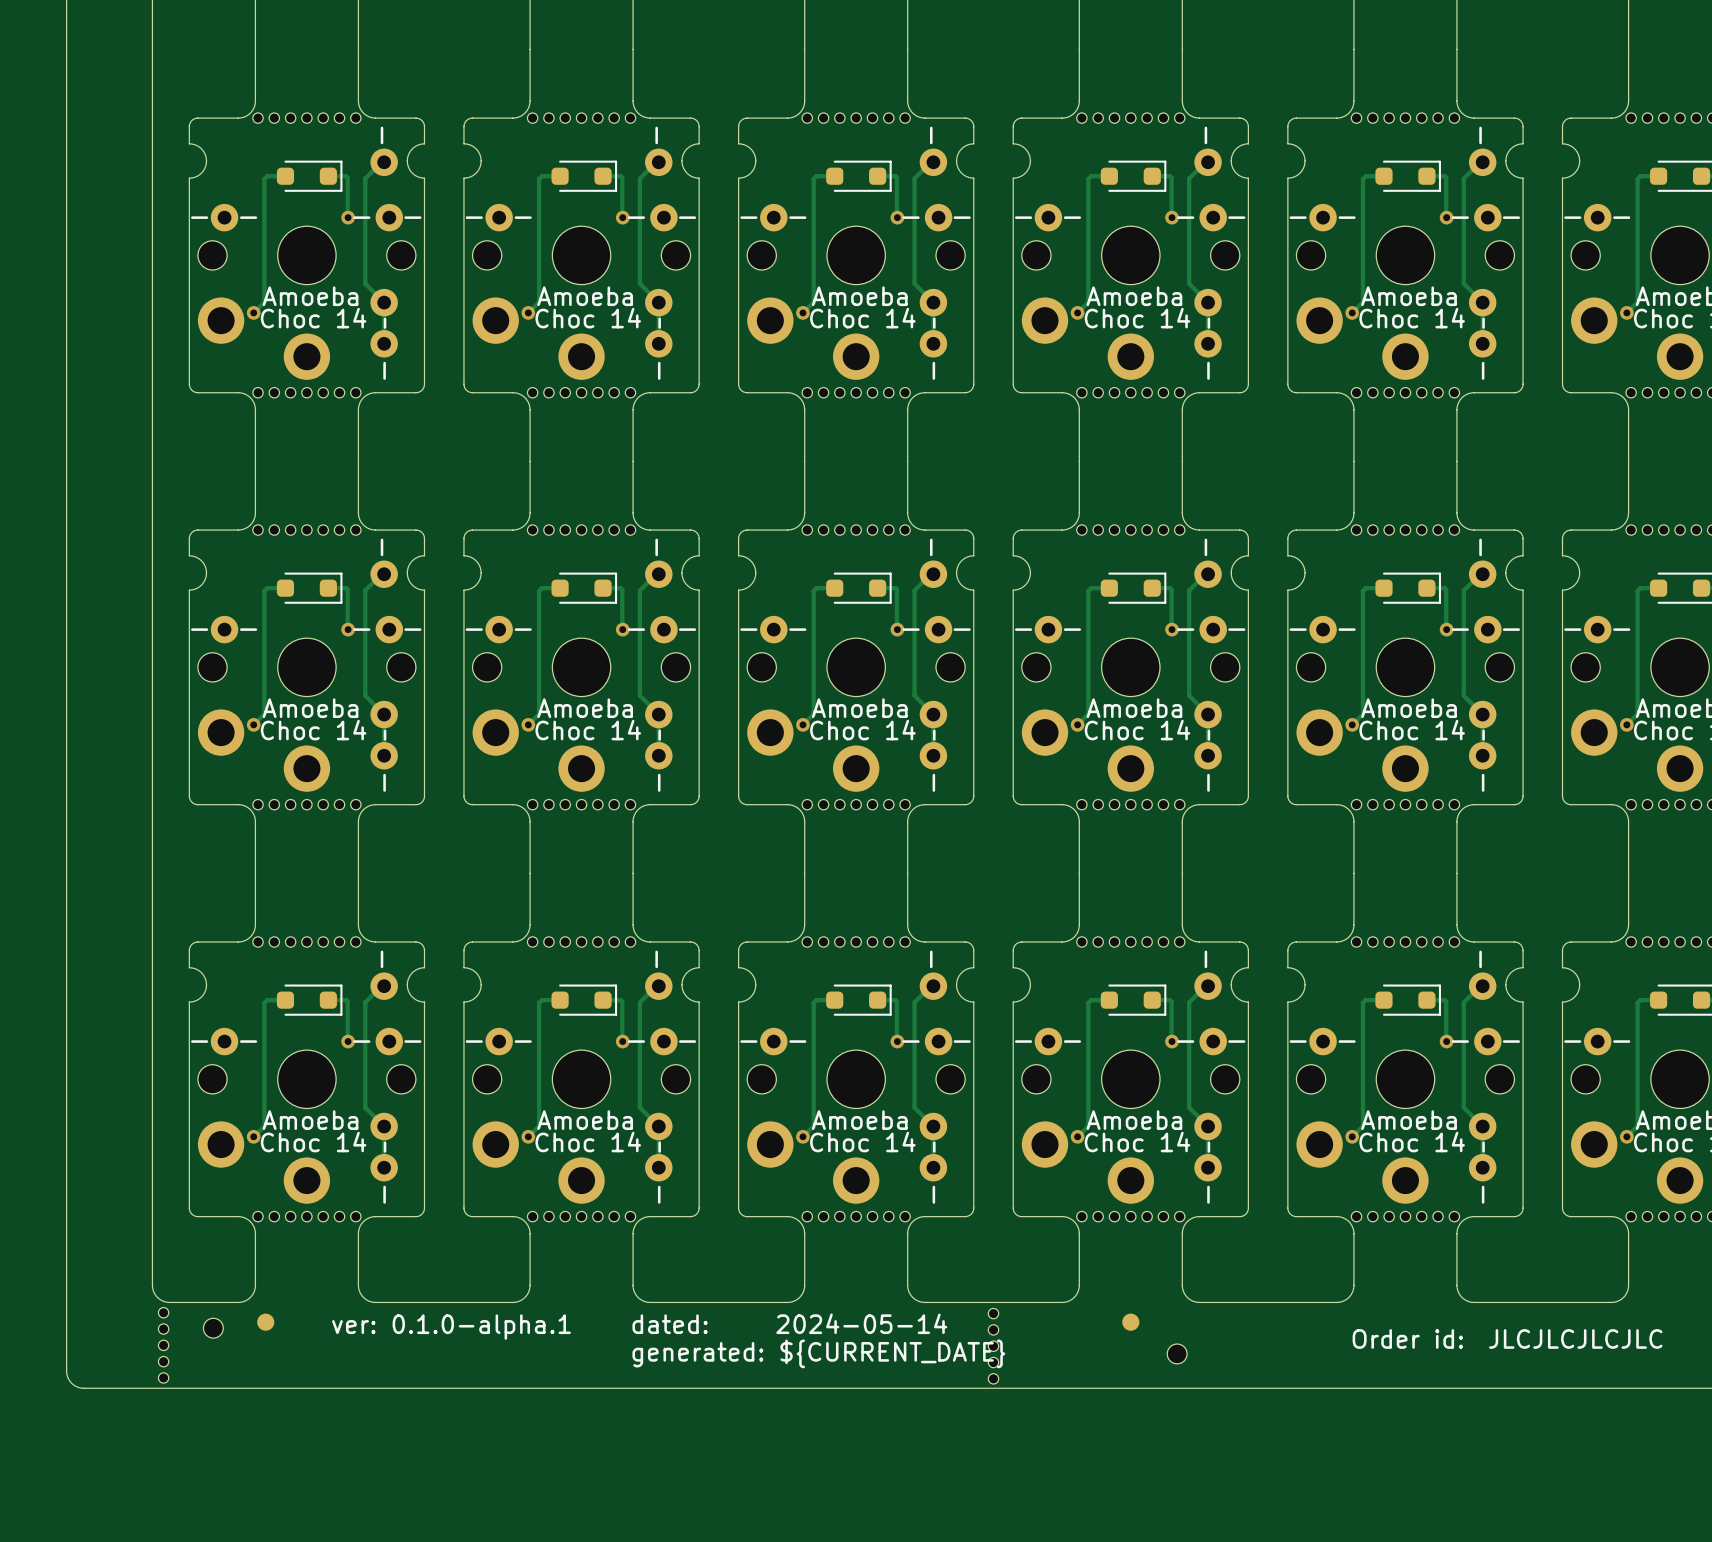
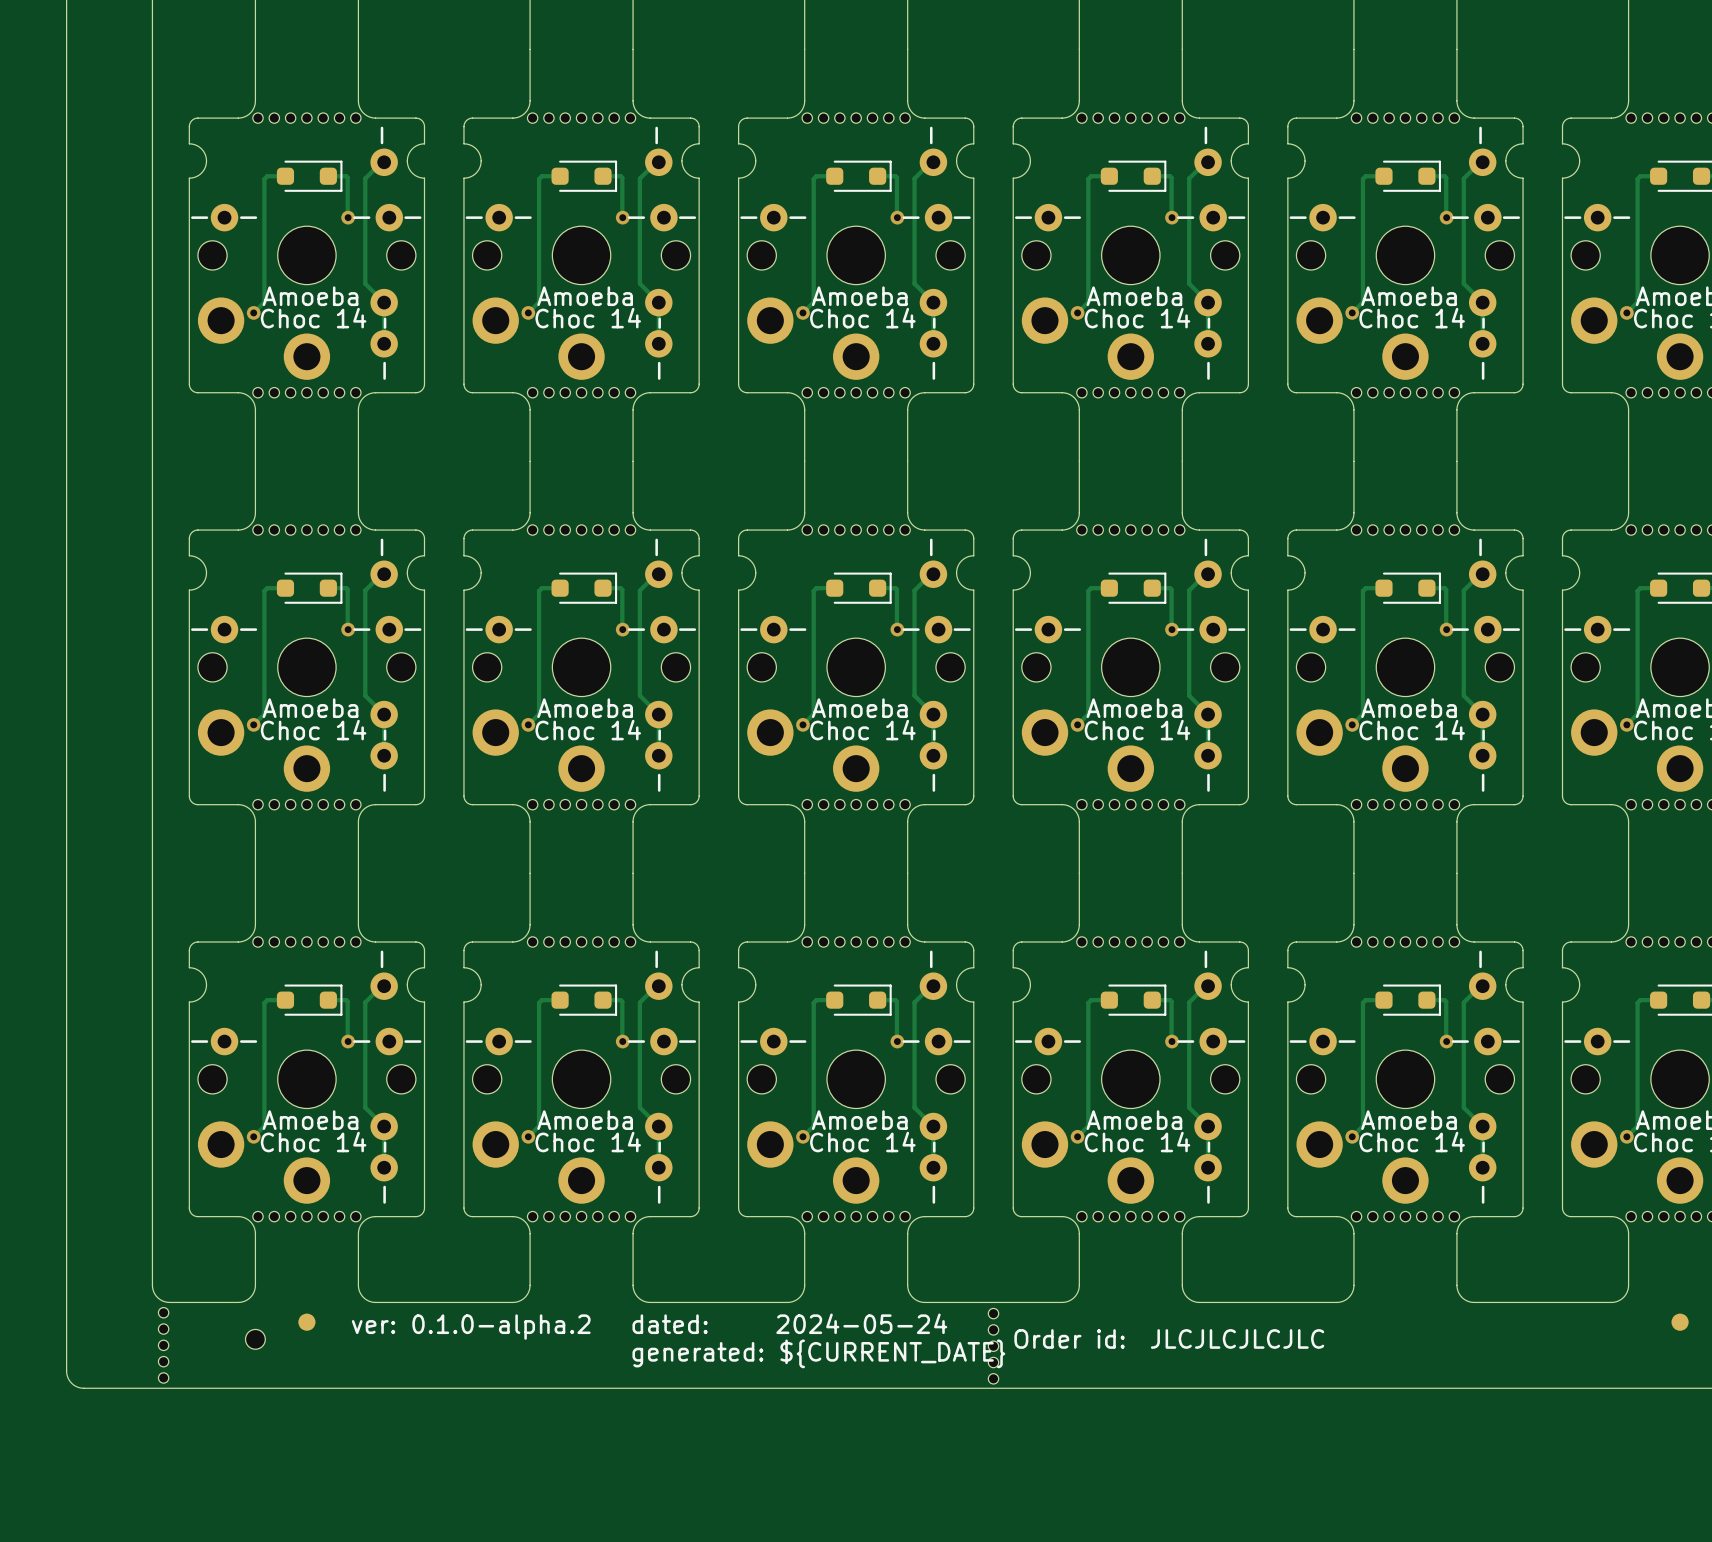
part position: (265, 1322) -> (306, 1322)
part: (1130, 1322) -> none
part: none -> (1680, 1322)
text: dated: 2024-05-14 (789, 1323) -> dated: 2024-05-24 (789, 1323)
text: ver: 0.1.0-alpha.1 (451, 1327) -> ver: 0.1.0-alpha.2 (471, 1327)
part position: (213, 1328) -> (255, 1339)
text position: Order id: (1407, 1338) -> Order id: (1069, 1338)
text position: JLCJLCJLCJLC (1575, 1338) -> JLCJLCJLCJLC (1237, 1338)
part: (1177, 1353) -> none

